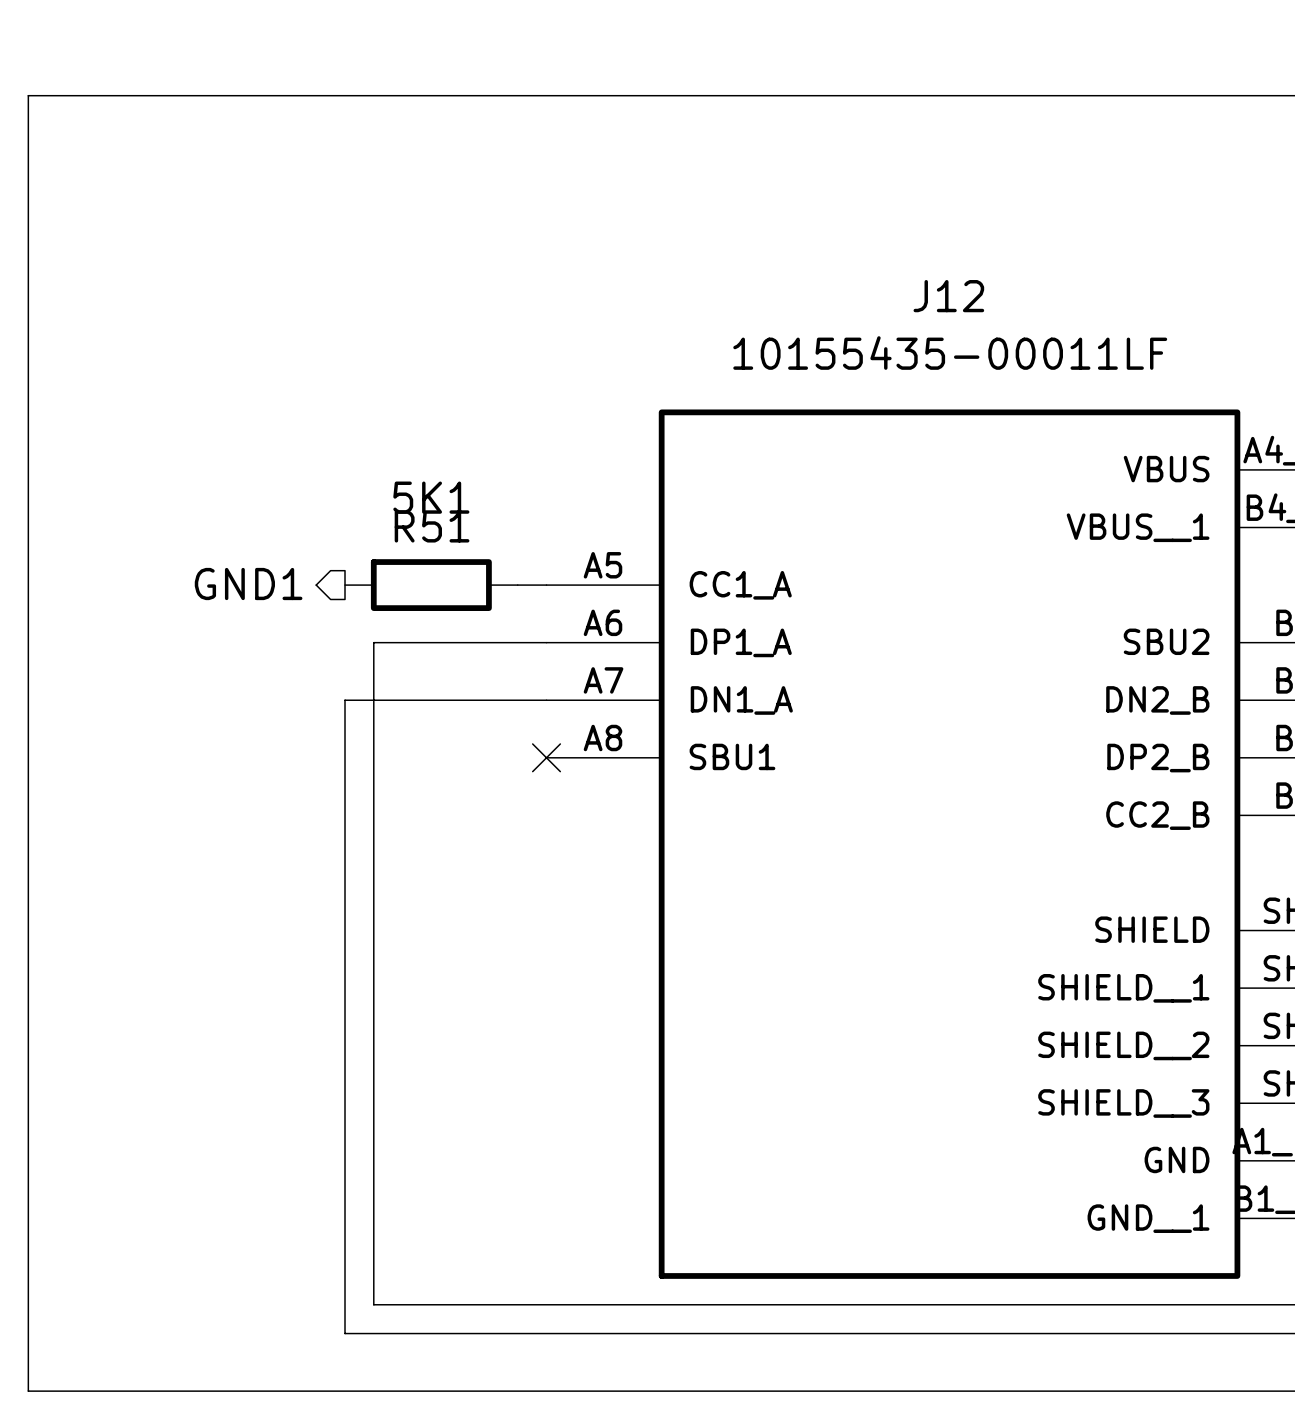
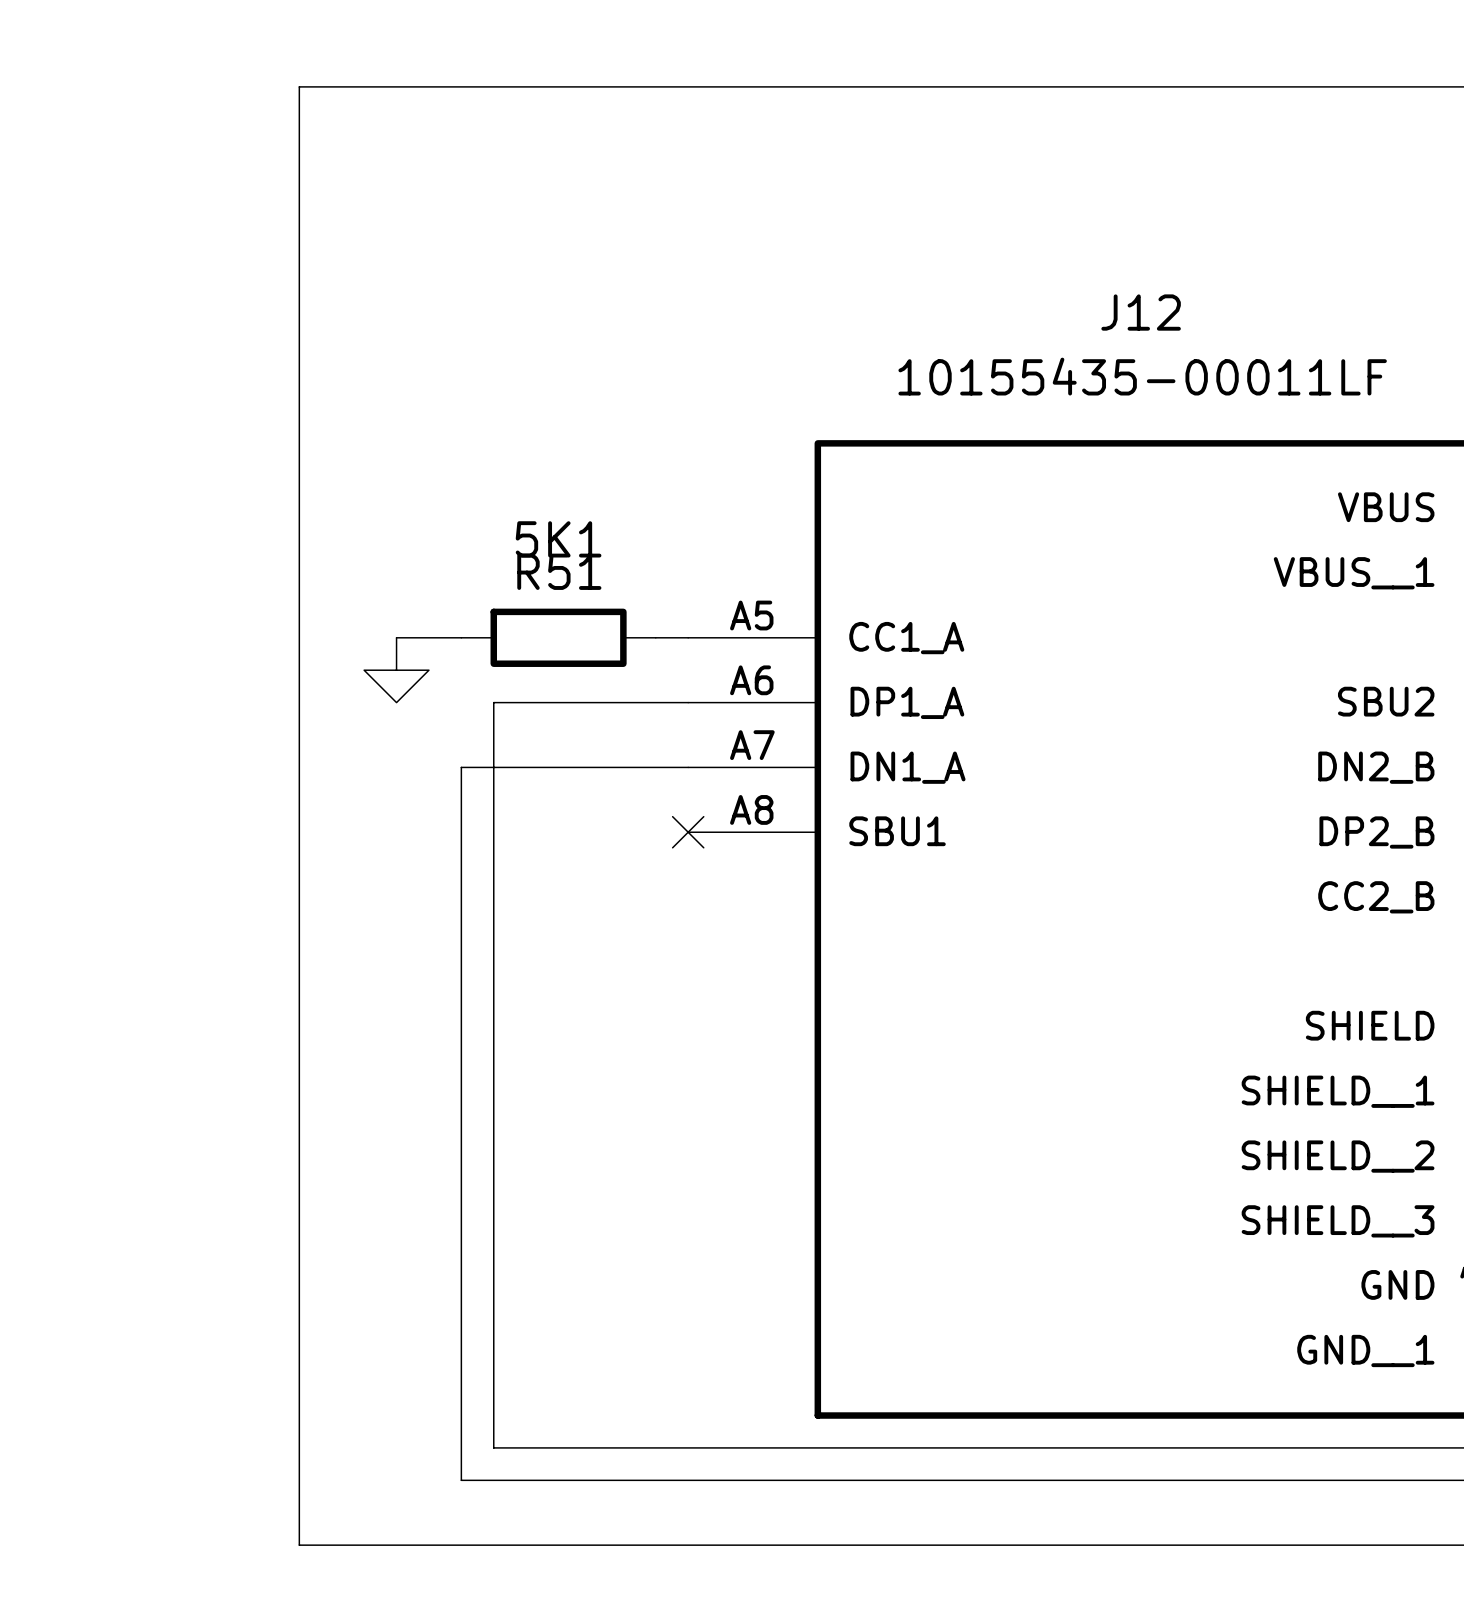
line: (201, 95) (28, 95) (28, 1391) (201, 1391) -> (299, 86) (299, 1545)
hierarchical label: GND1 (248, 584) -> none
wire: none -> (396, 637) (461, 637)
power symbol: none -> (396, 670)

